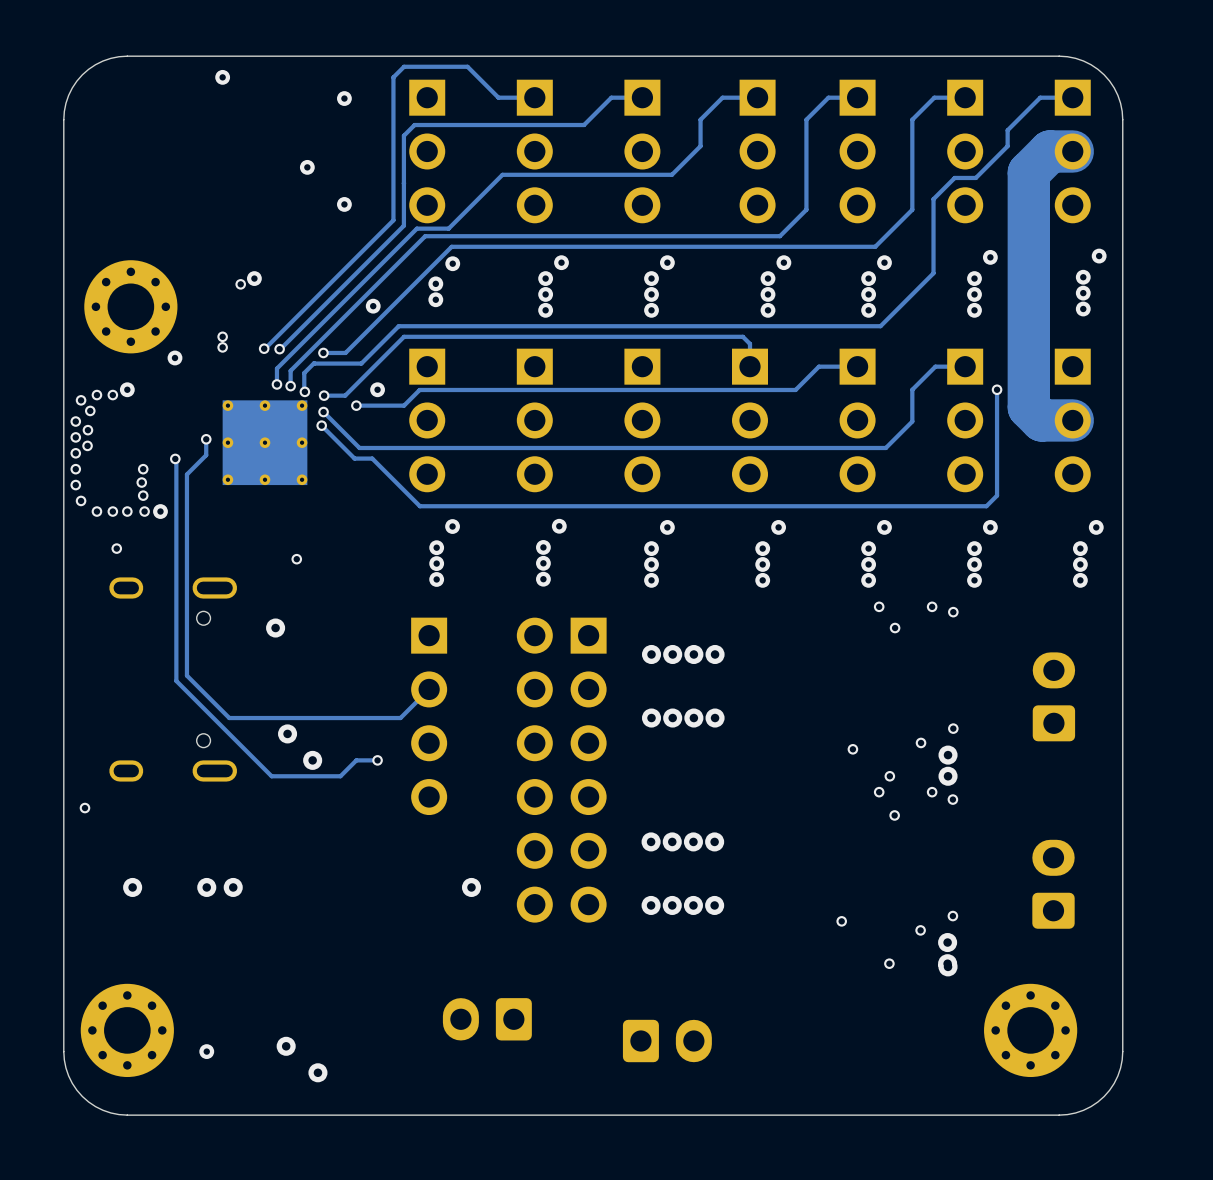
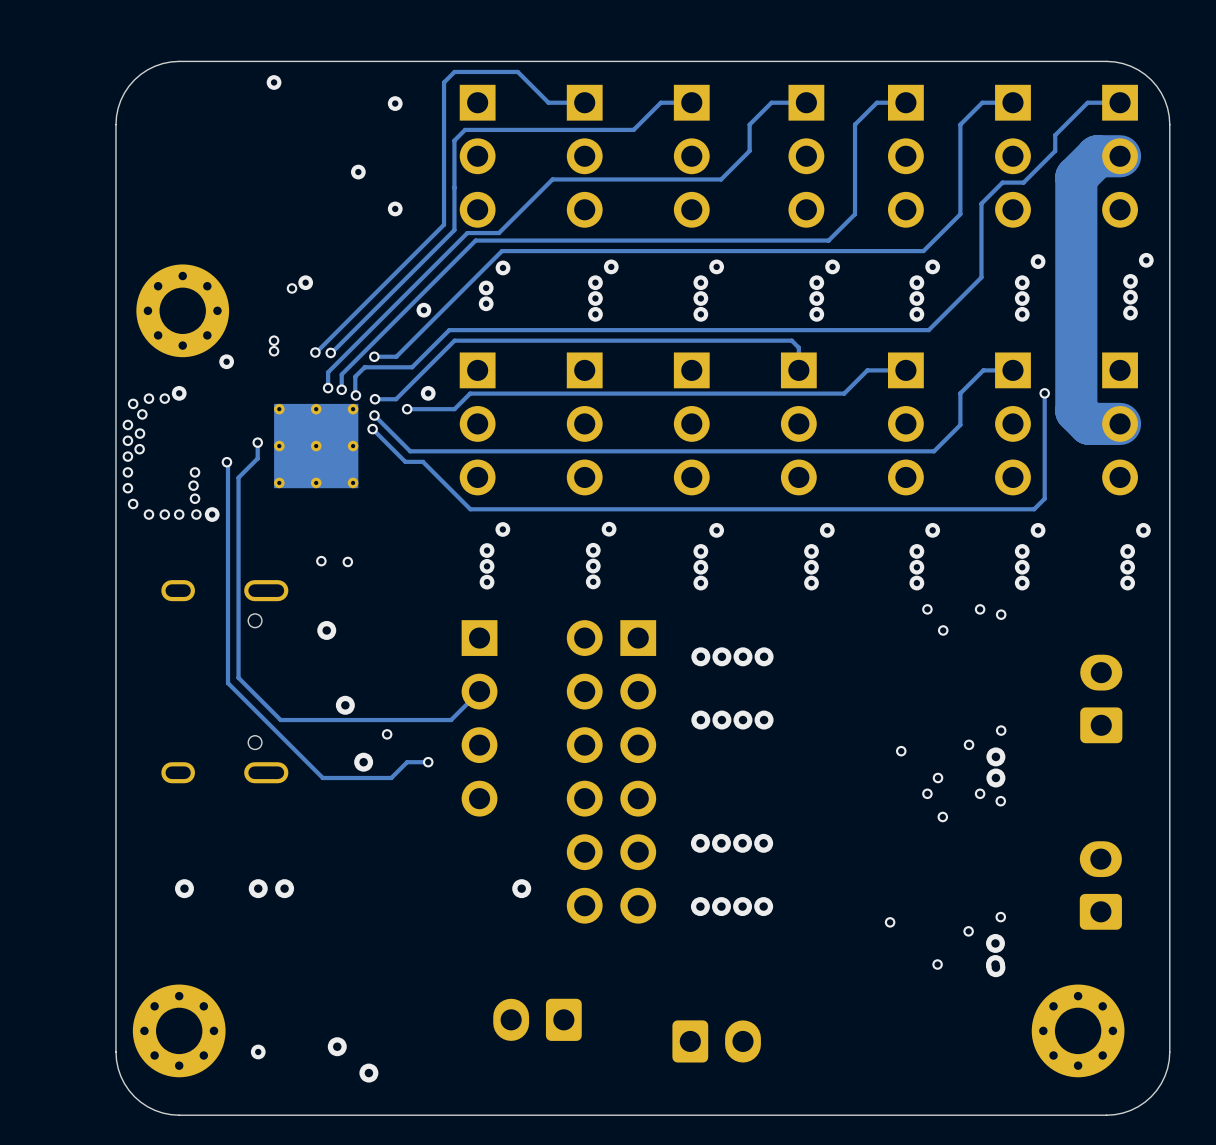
via: (116, 548) -> none
via: none -> (321, 561)
via: none -> (387, 734)
via position: (287, 733) -> (345, 705)
via: (84, 808) -> none

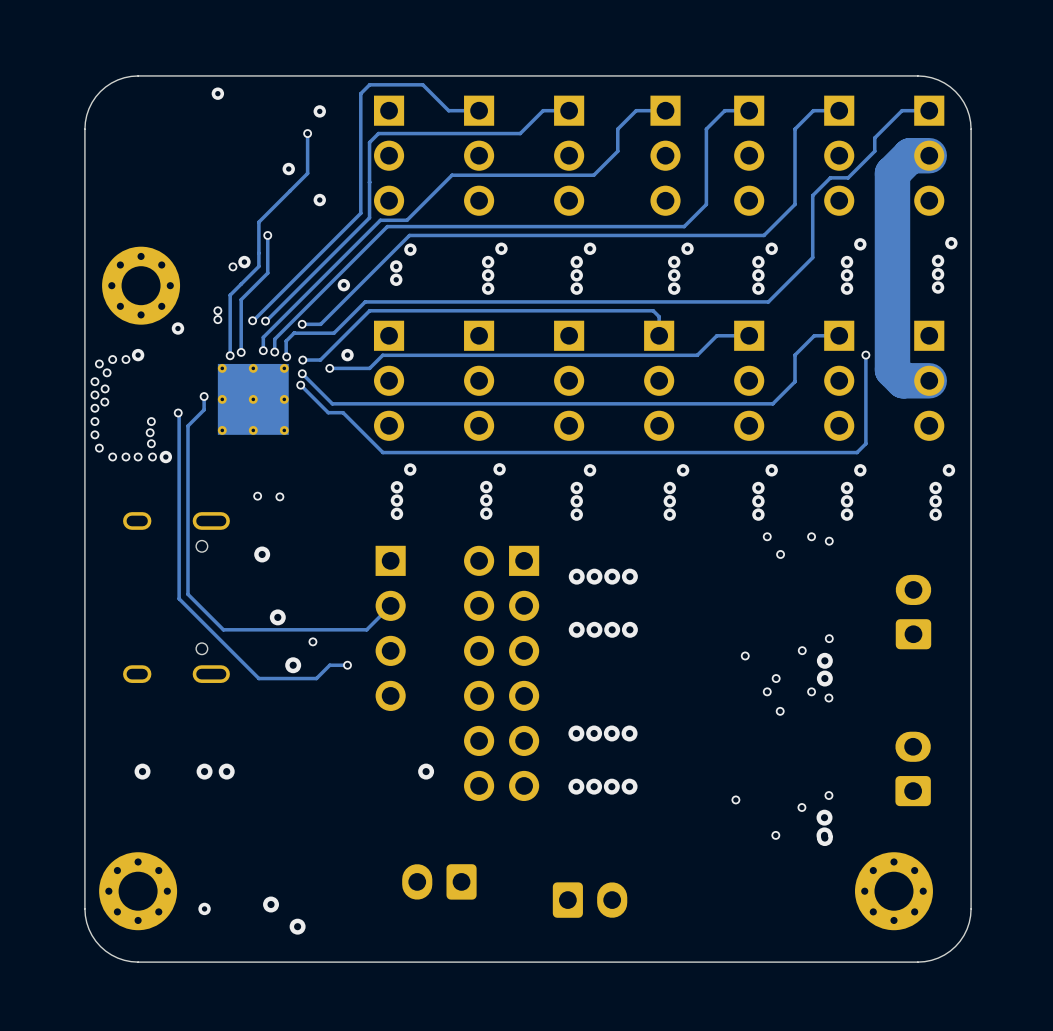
track: none -> (307, 133) (307, 173) (258, 222) (258, 266) (230, 295) (230, 355)
via: none -> (307, 133)
track: none -> (267, 235) (267, 273) (241, 299) (241, 352)
via: none -> (267, 235)
via: none -> (241, 352)
via: none -> (230, 355)

